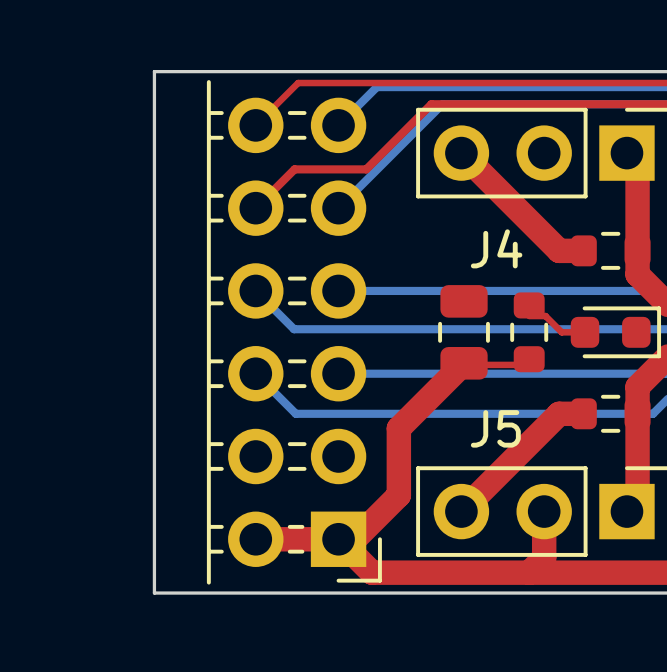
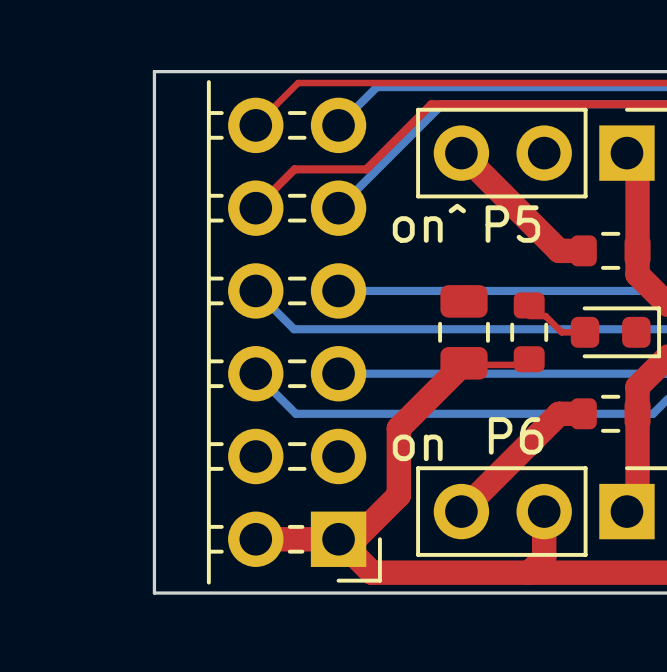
text: none -> on^ (429, 223)
text: none -> P5 (512, 224)
J4 name: J4 (496, 248) -> none
J5 name: J5 (495, 428) -> none
text: none -> P6 (516, 435)
text: none -> on (417, 447)

